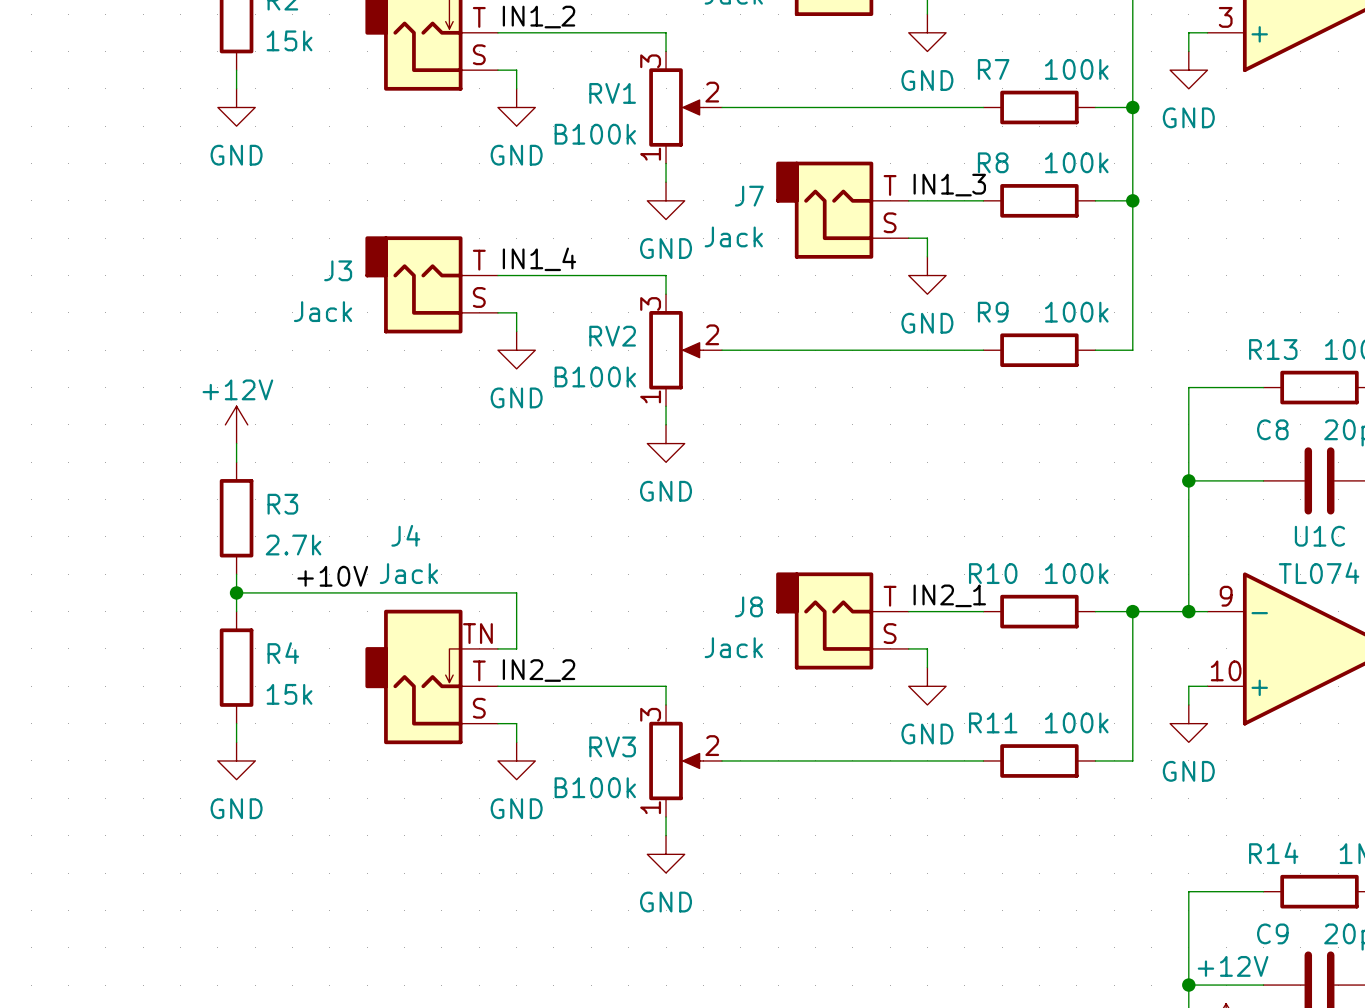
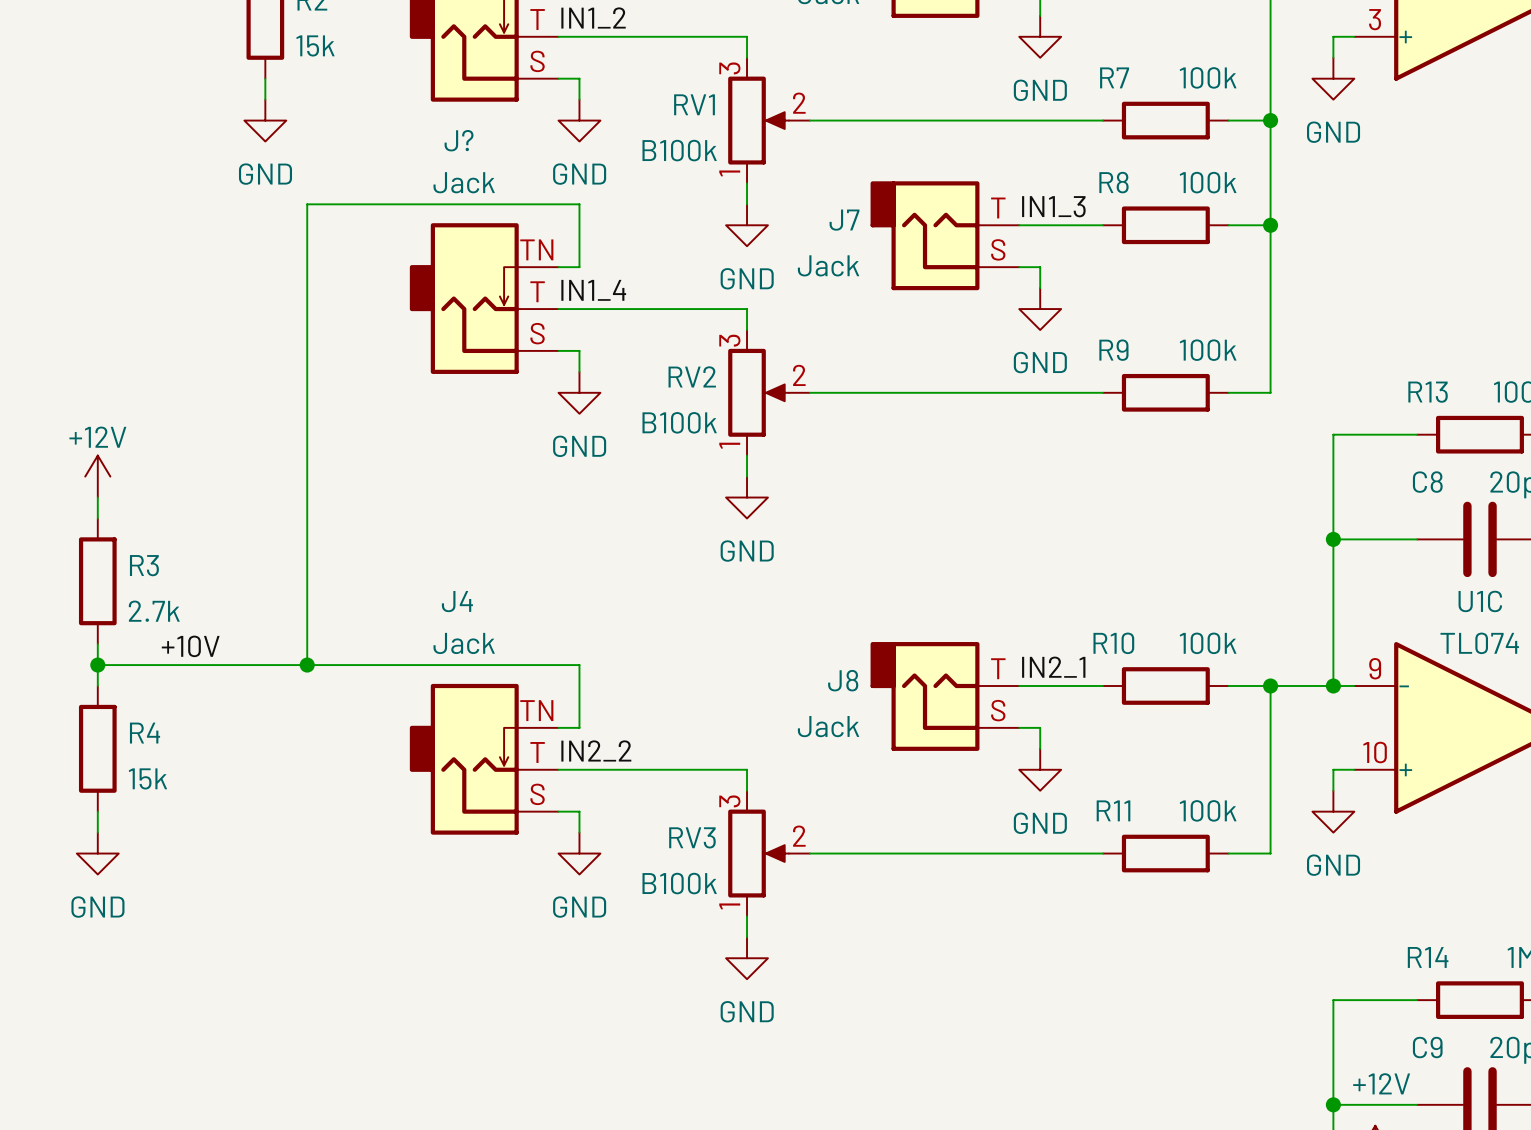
wire: none -> (558, 267) (579, 267) (579, 204) (307, 204) (307, 665)
J?: none -> Jack (484, 298)
J3: Jack (431, 284) -> none
power symbol position: +12V (236, 424) -> +12V (97, 476)
wire: (236, 443) (236, 462) -> (97, 497) (97, 518)
R3 position: (236, 518) -> (97, 581)
wire: (236, 574) (236, 611) -> (97, 644) (97, 686)
label position: +10V (332, 576) -> +10V (190, 646)
wire: none -> (97, 665) (265, 665)
junction: none -> (97, 665)
junction position: (236, 592) -> (307, 665)
R4 position: (236, 667) -> (97, 748)
wire: (236, 723) (236, 742) -> (97, 811) (97, 832)
power symbol position: GND (236, 760) -> GND (97, 853)

